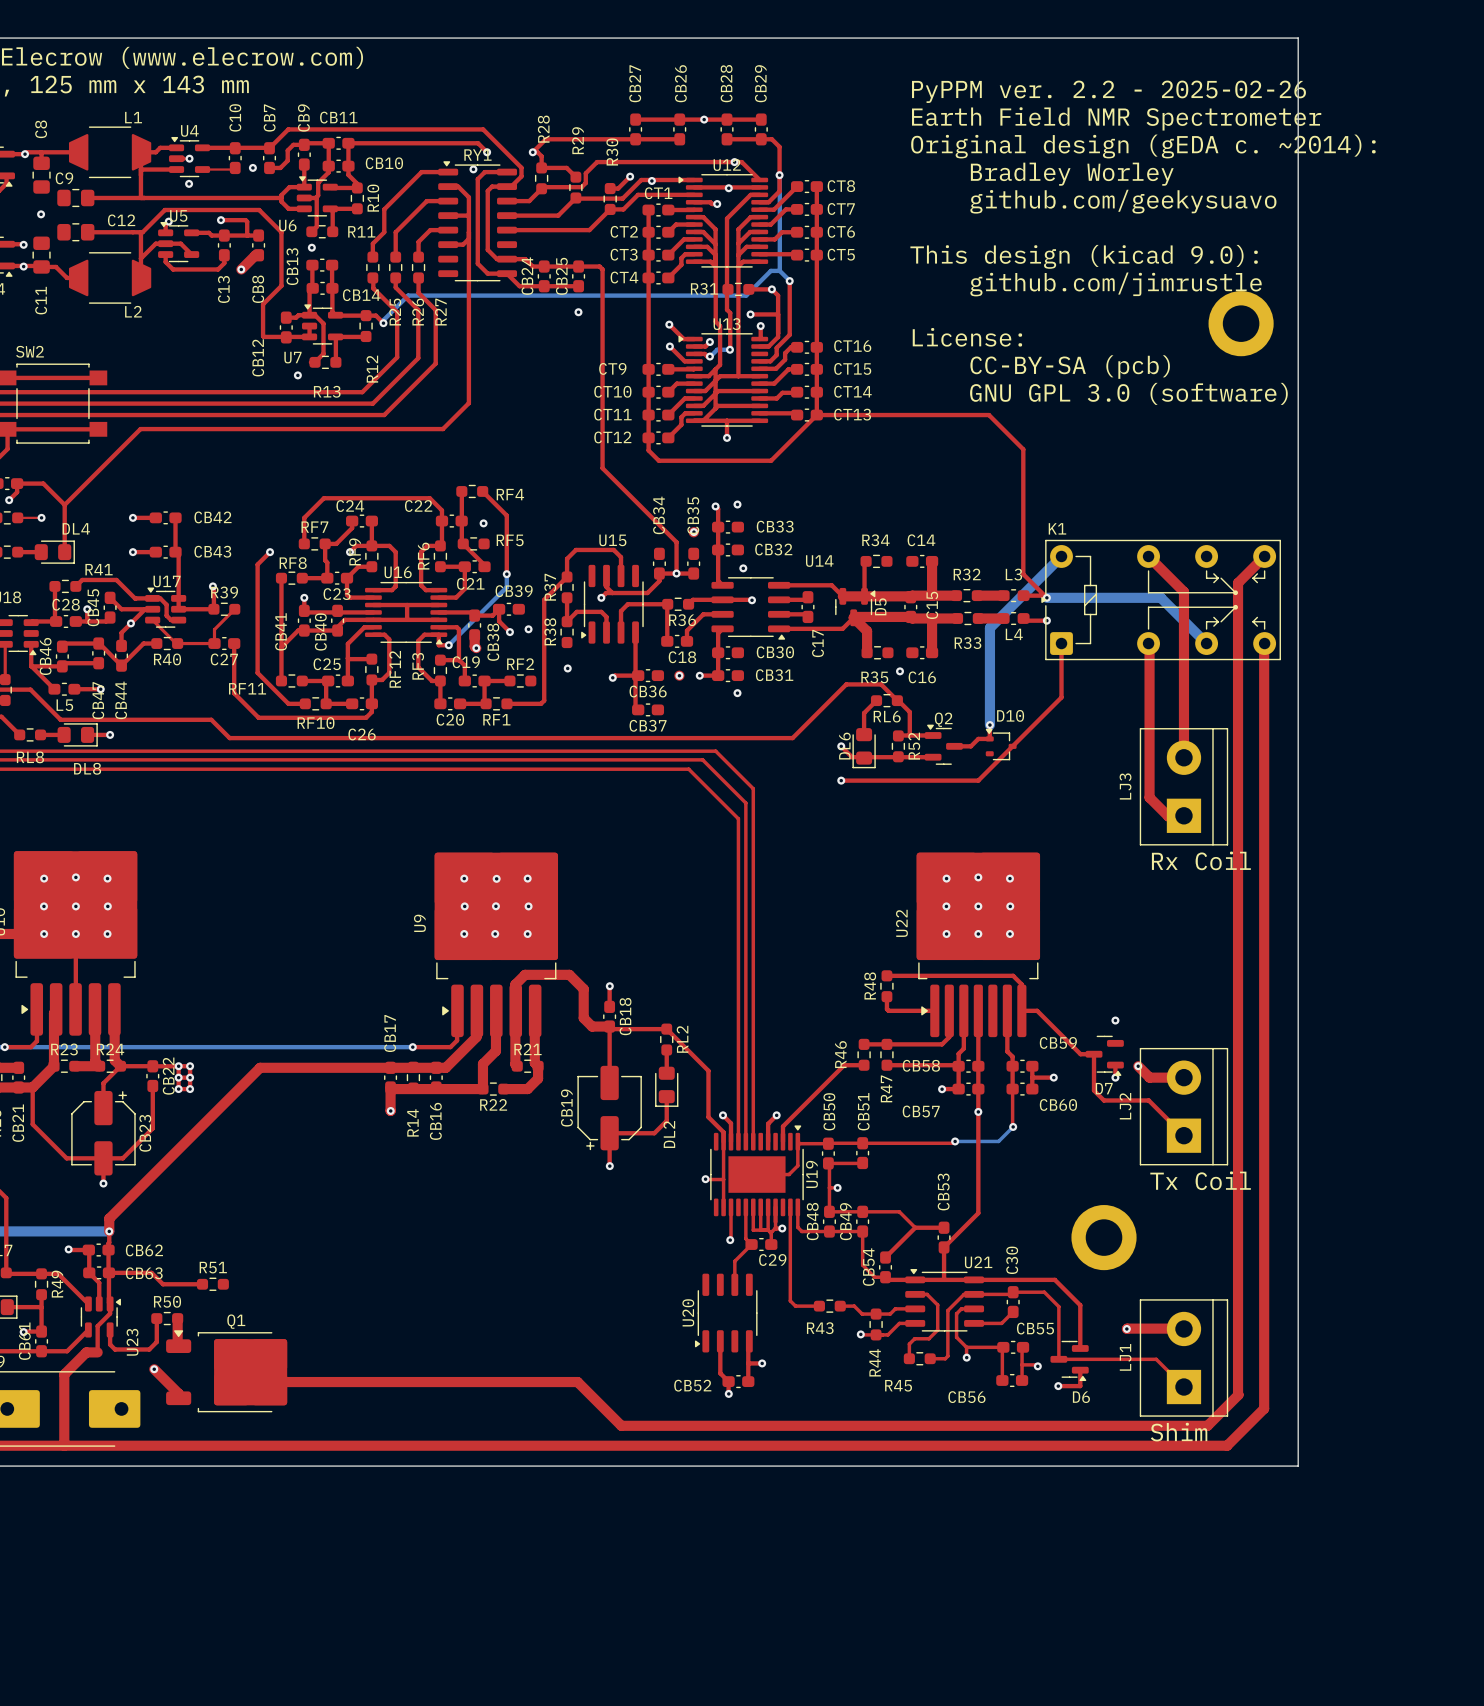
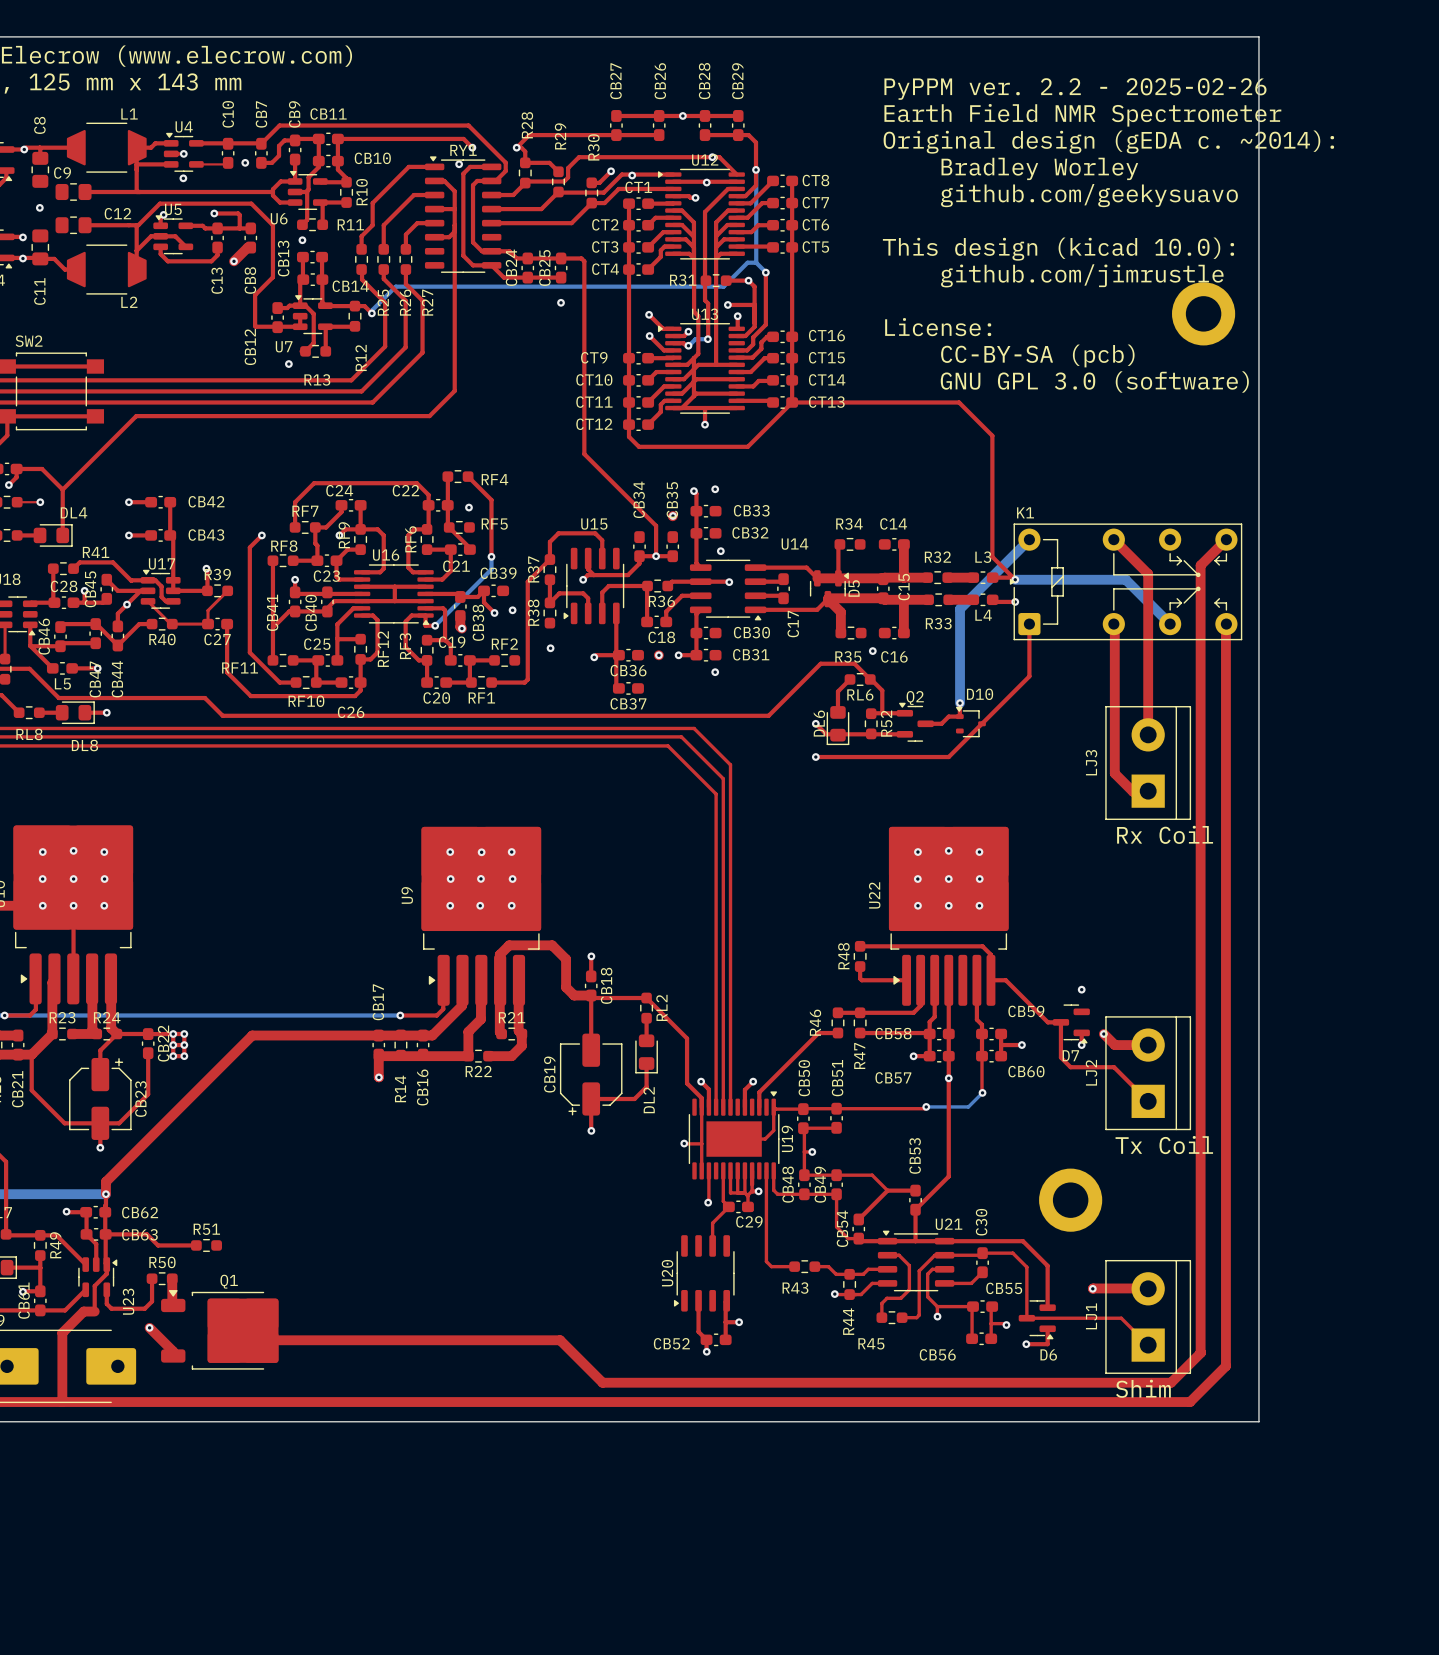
text: This design (kicad 9.0): (1084, 256) -> This design (kicad 10.0): (1058, 249)

